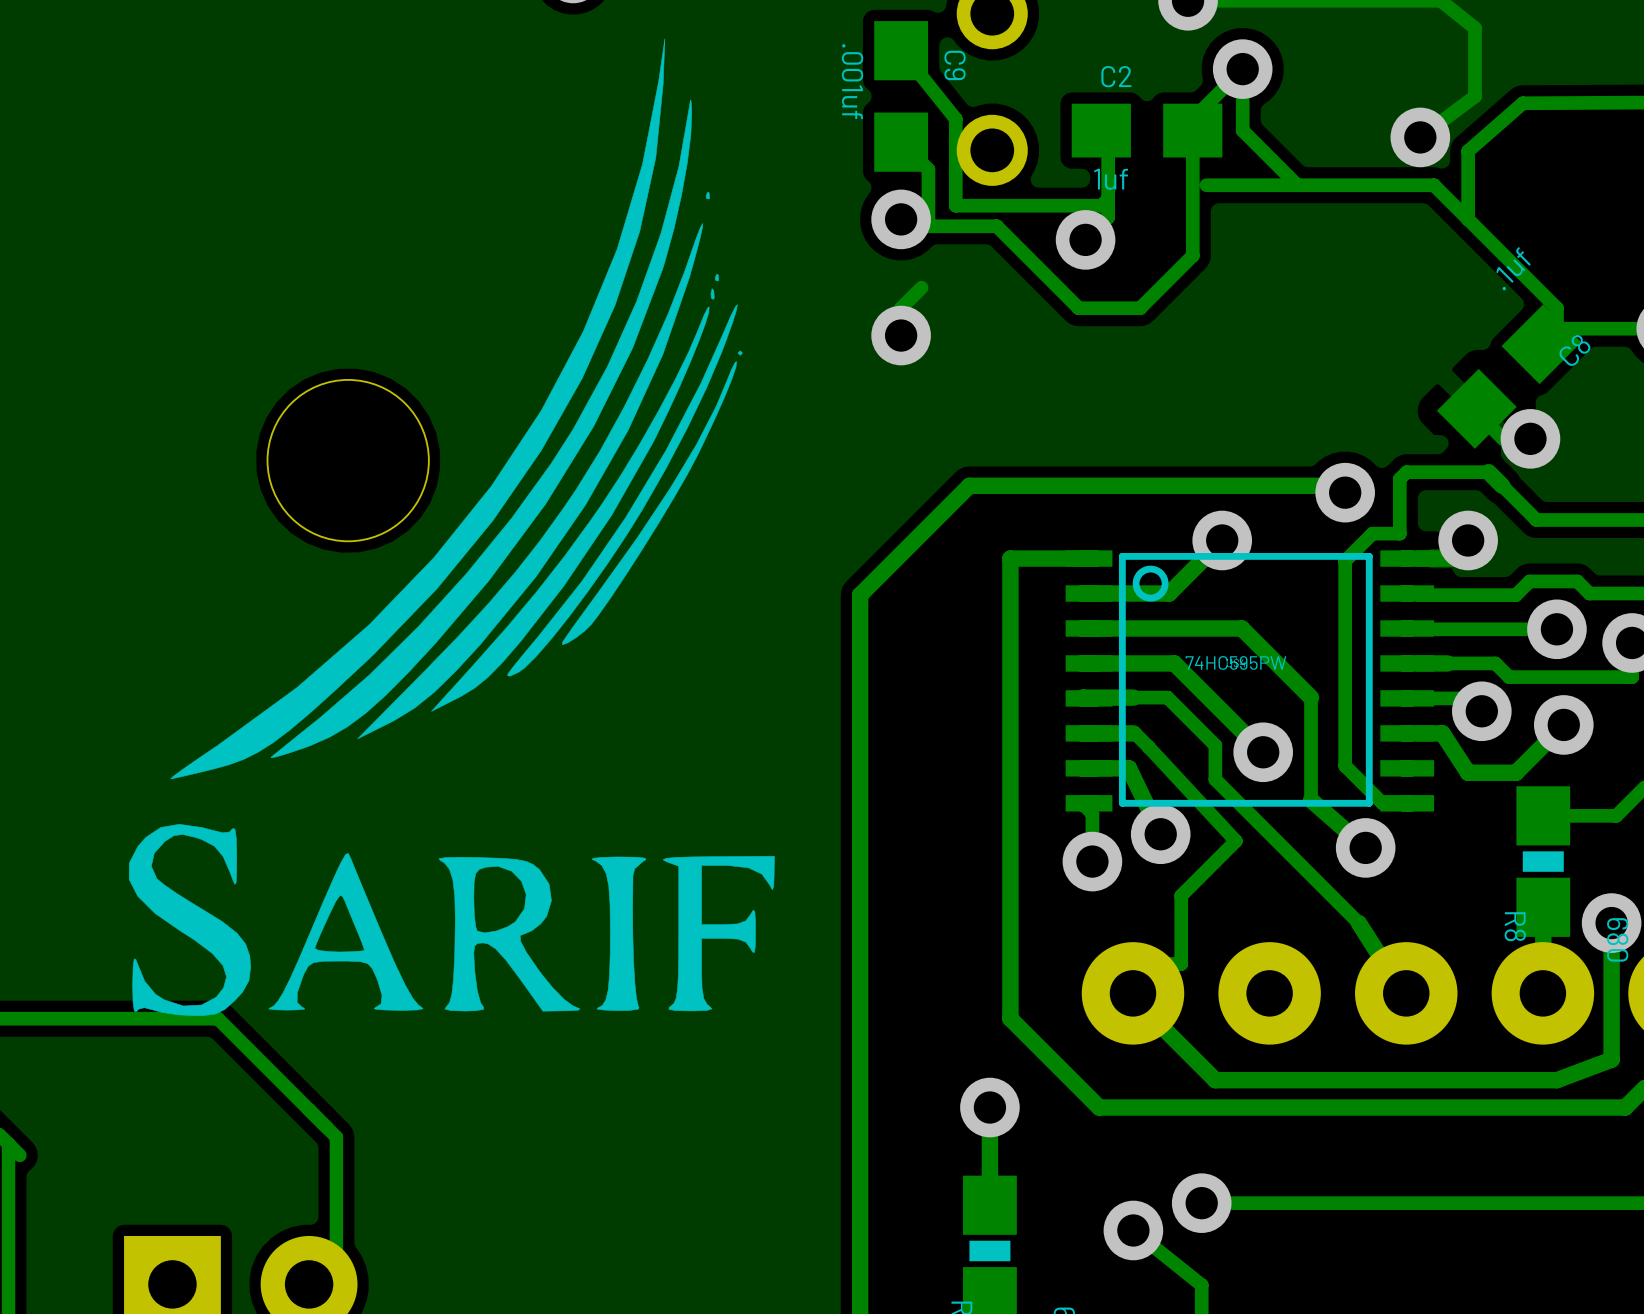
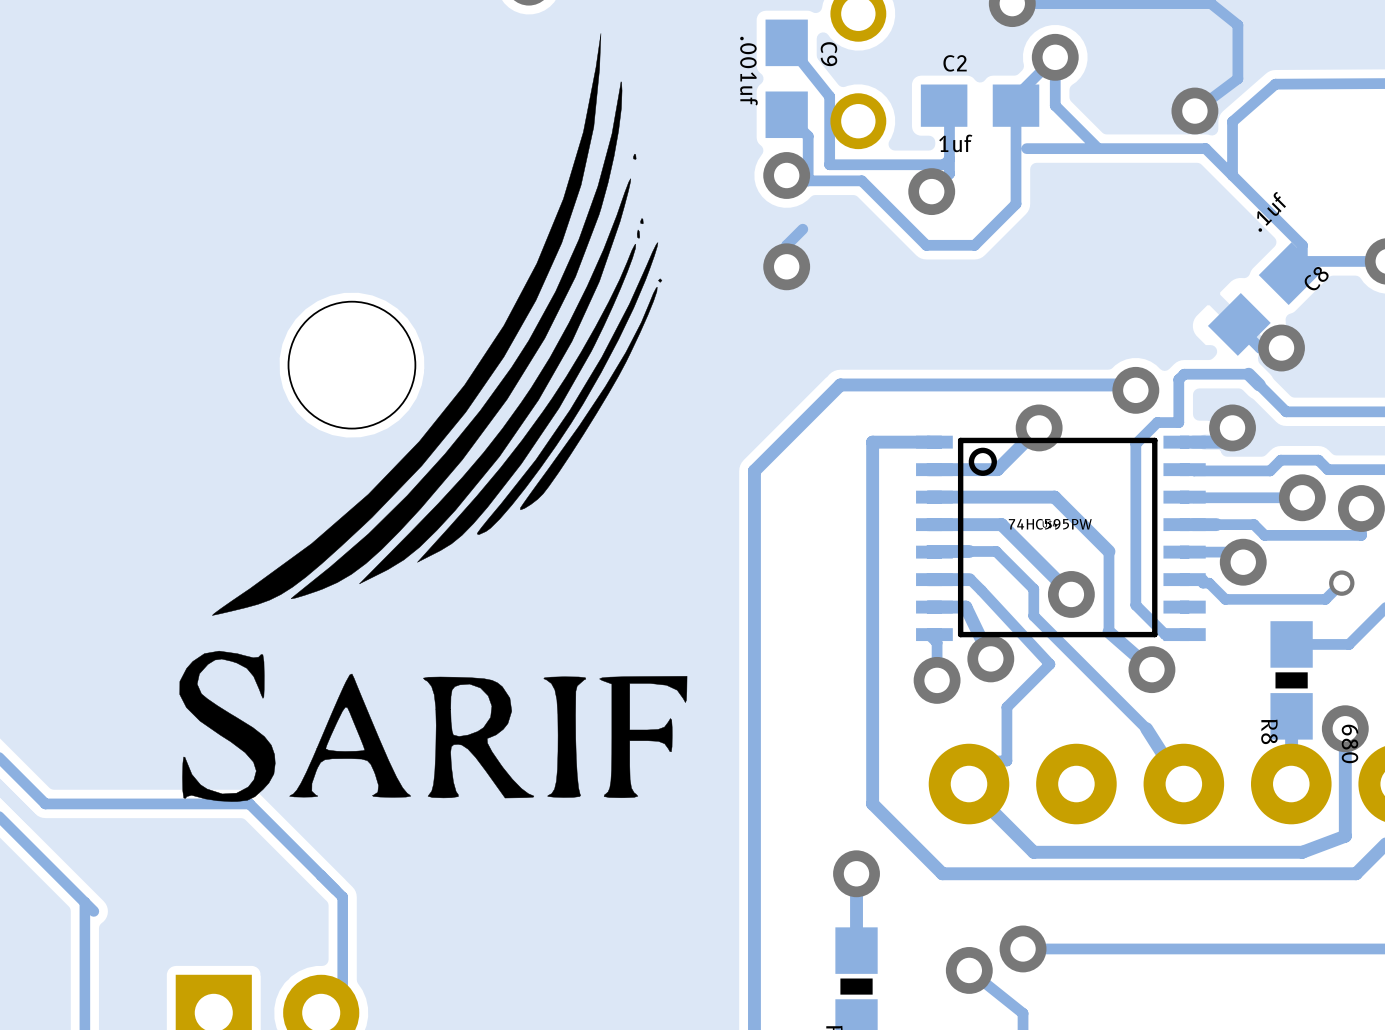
via size: [1533, 695, 1594, 755] -> [1329, 570, 1355, 596]
track: (1563, 724) (1515, 772) (1468, 772) (1442, 733) (1417, 733) -> none
track: none -> (1202, 579) (1202, 583) (1209, 583) (1225, 599) (1325, 599) (1341, 583)

